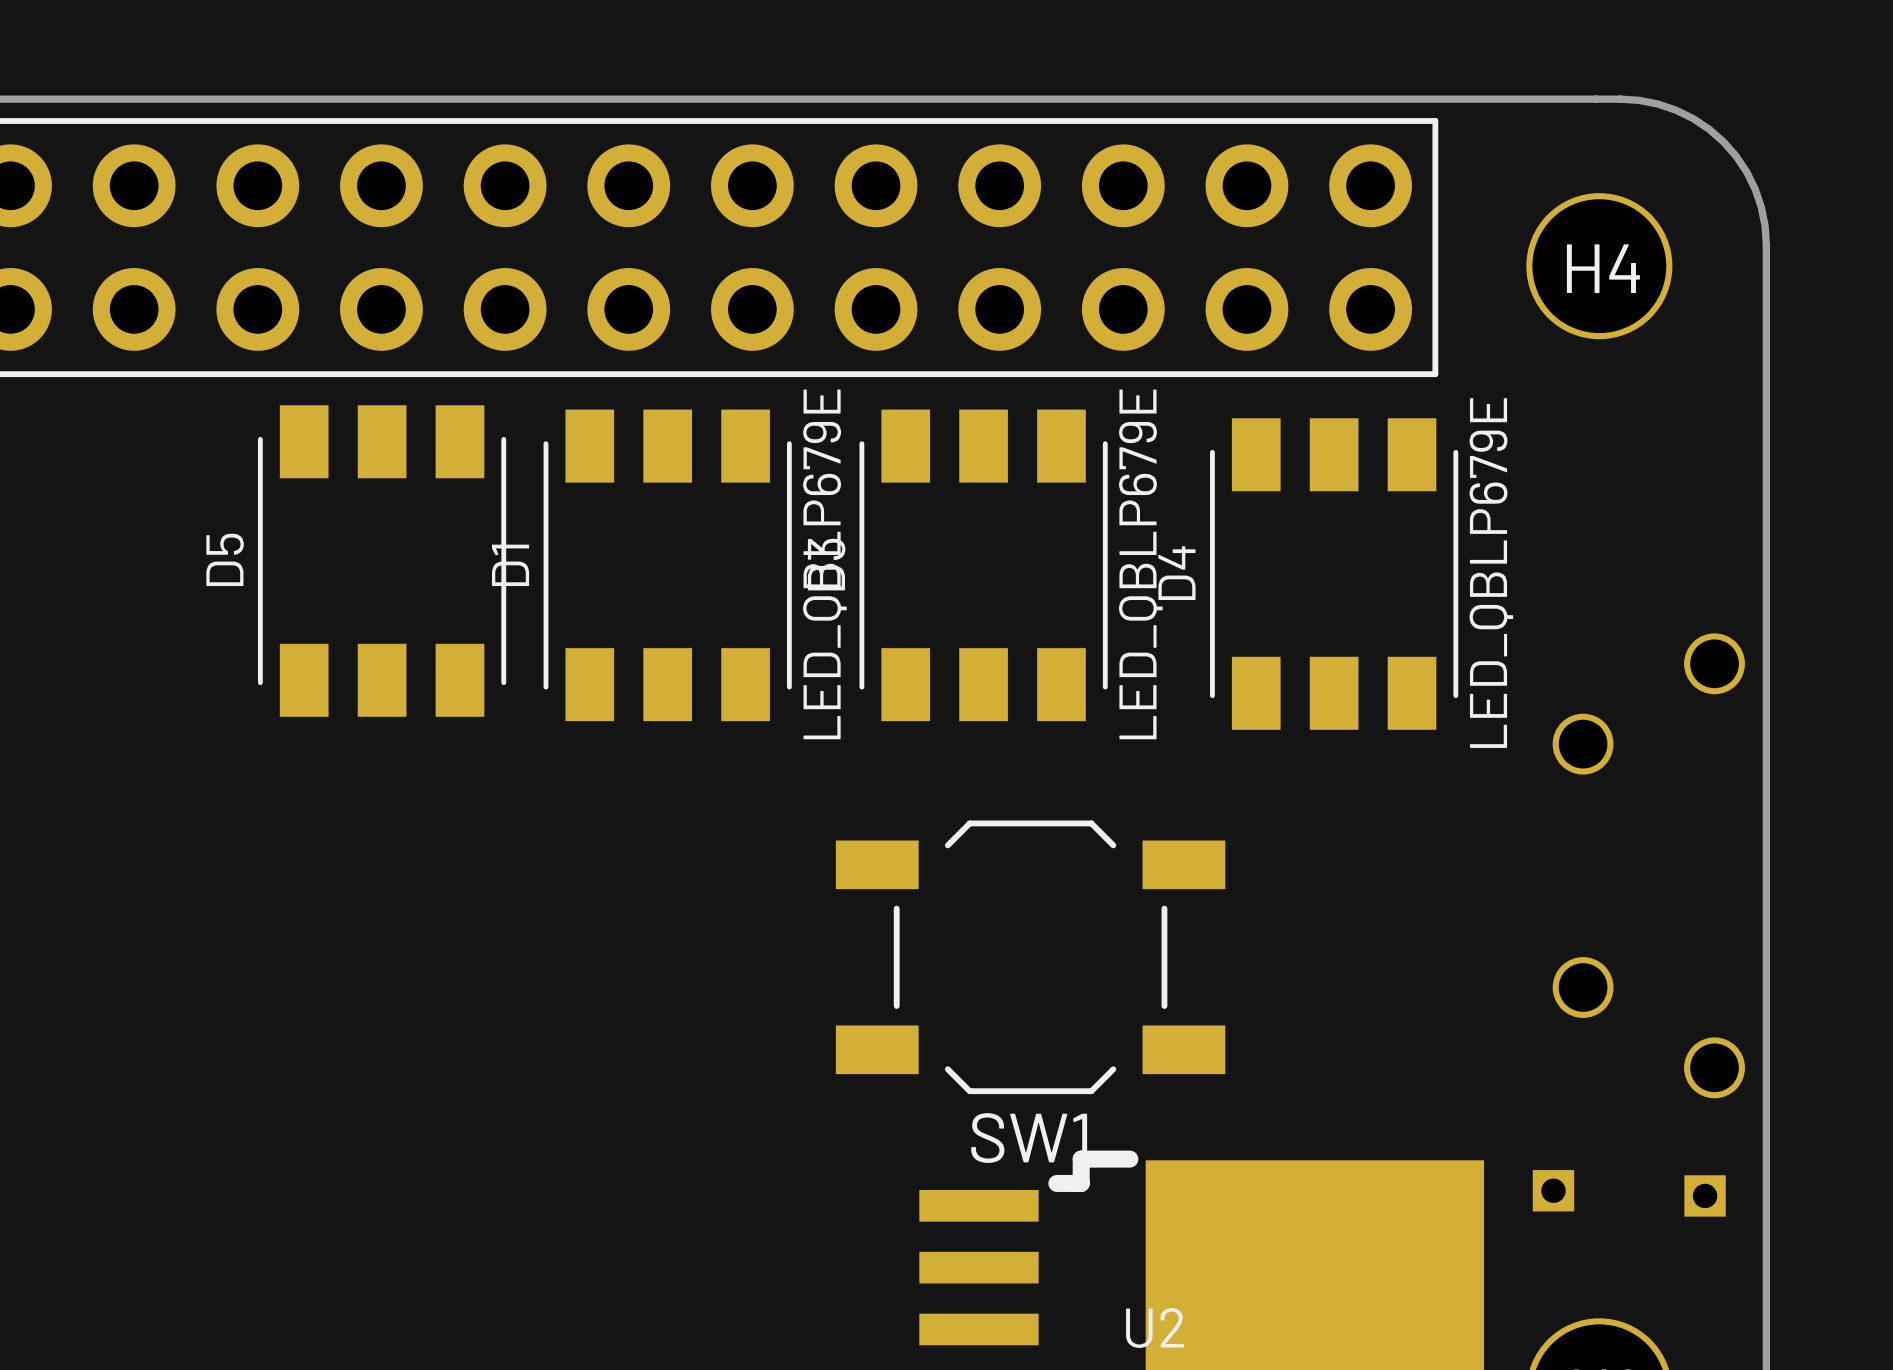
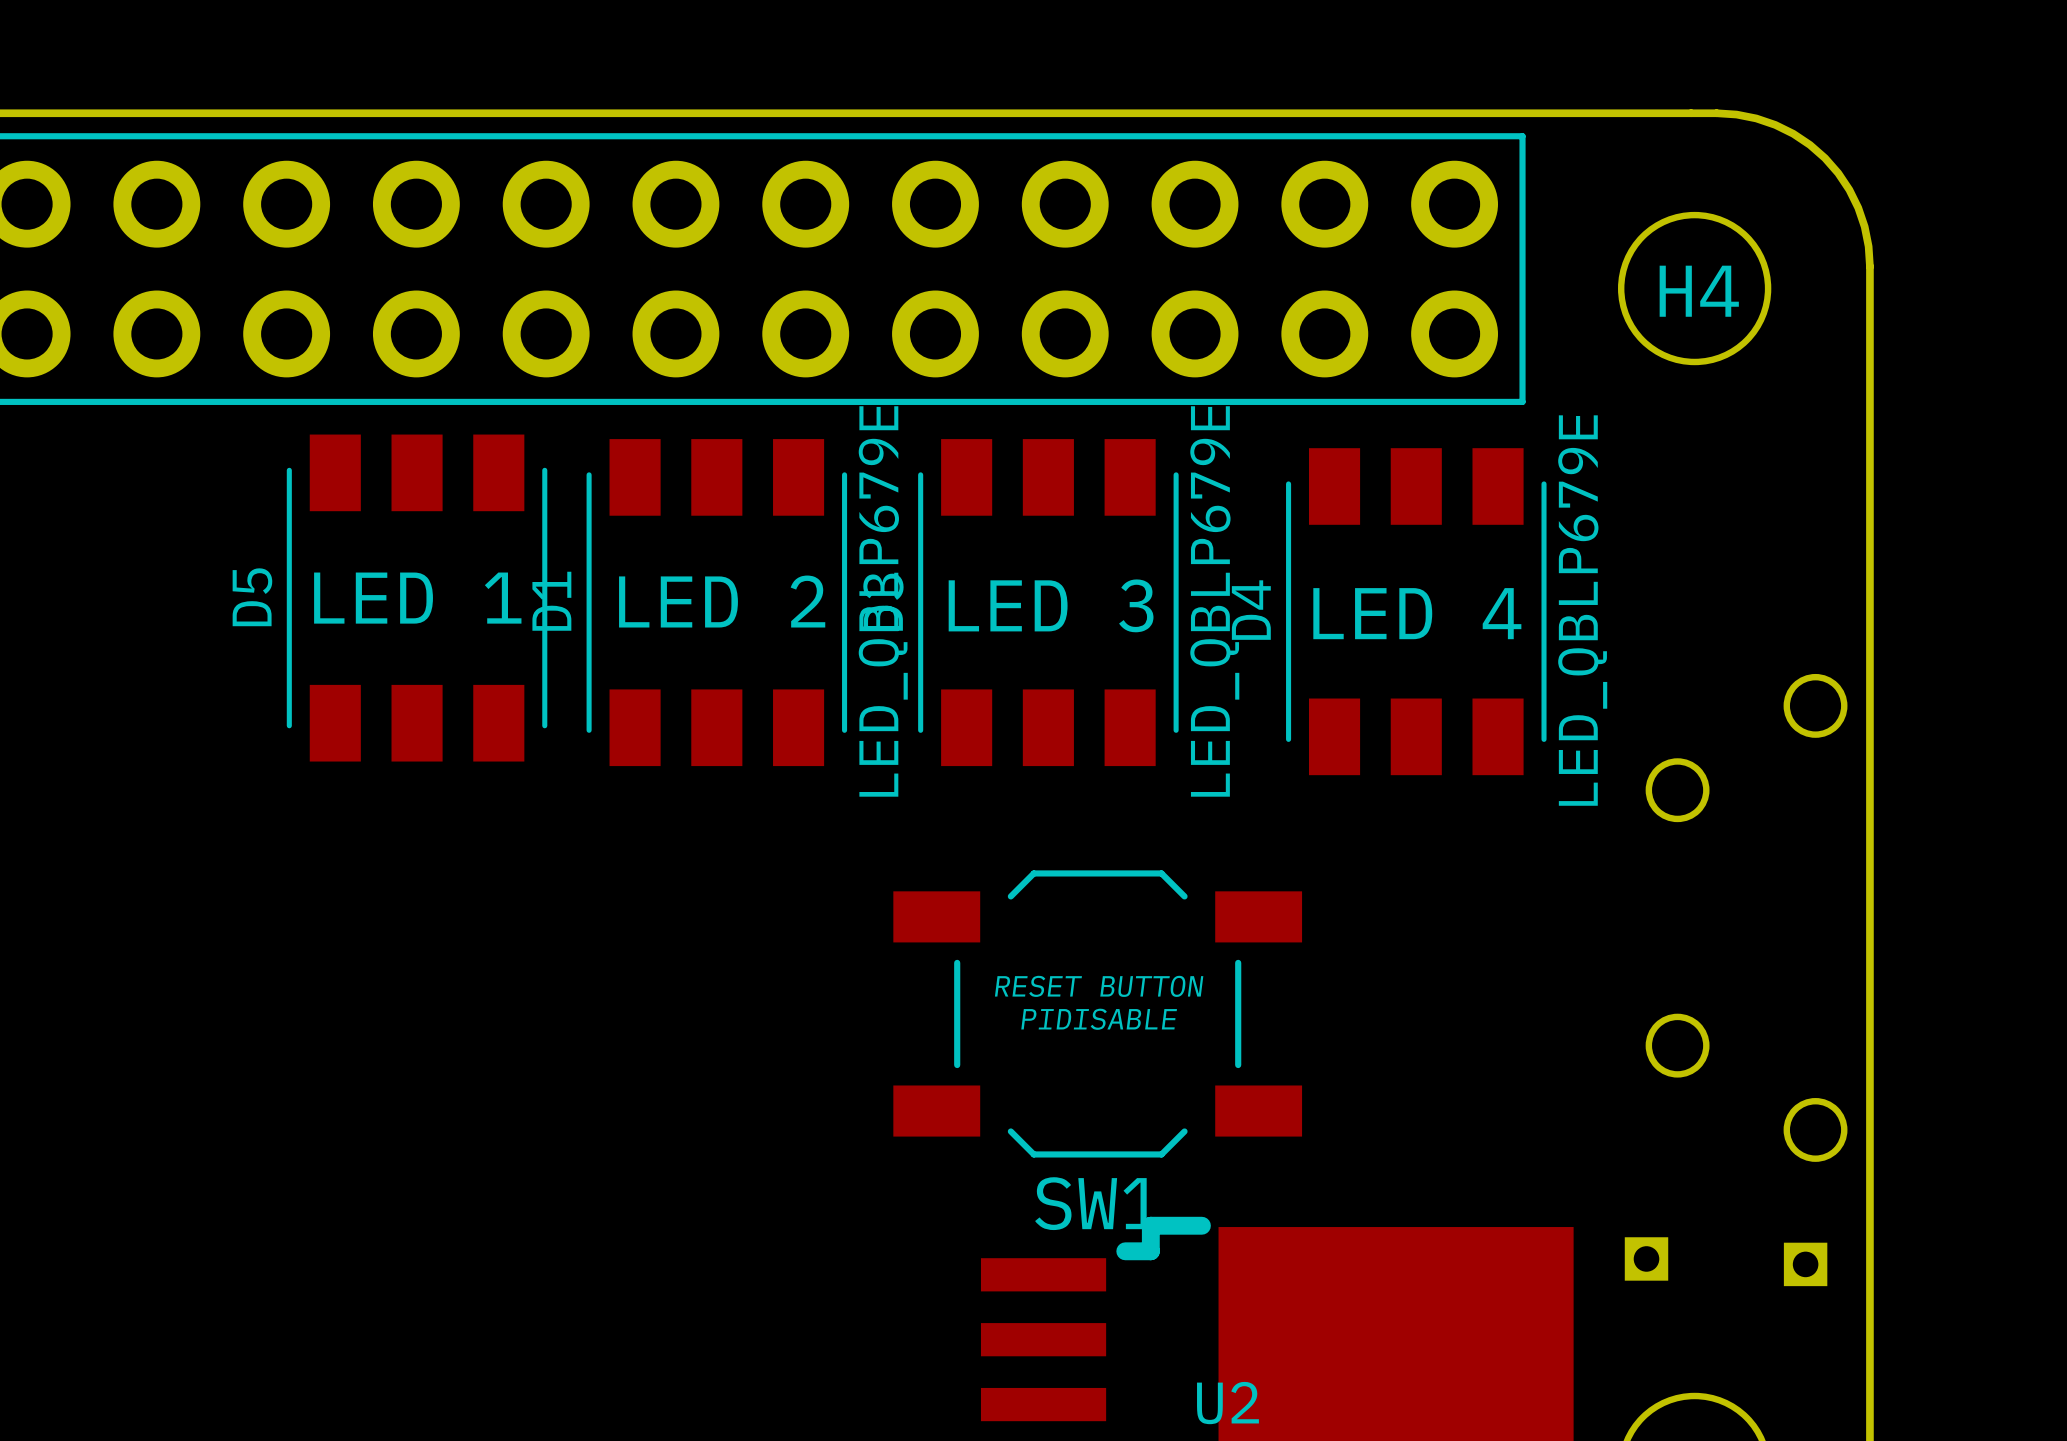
text: none -> LED 1 (417, 598)
text: none -> LED 2 (722, 601)
text: none -> LED 3 (1051, 605)
text: none -> LED 4 (1417, 613)
text: none -> RESET BUTTON (1099, 986)
text: none -> PIDISABLE (1099, 1019)

